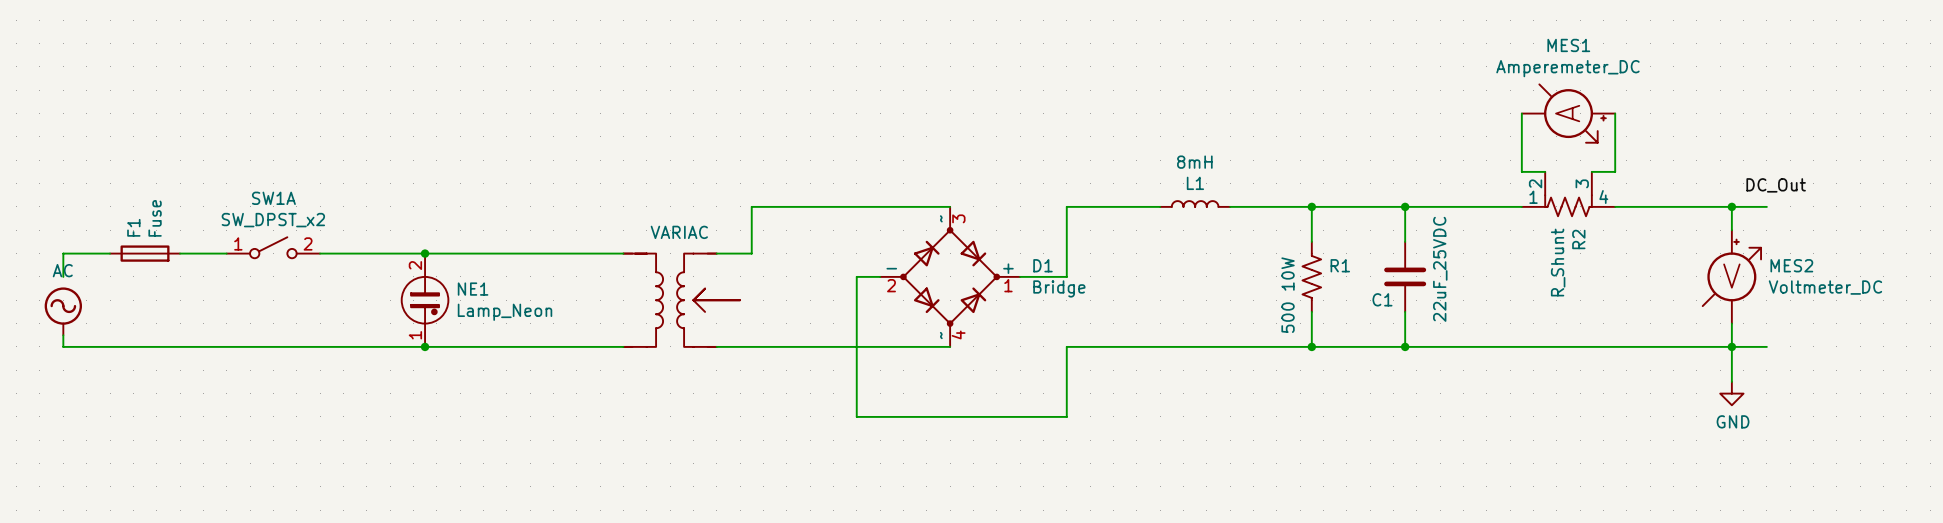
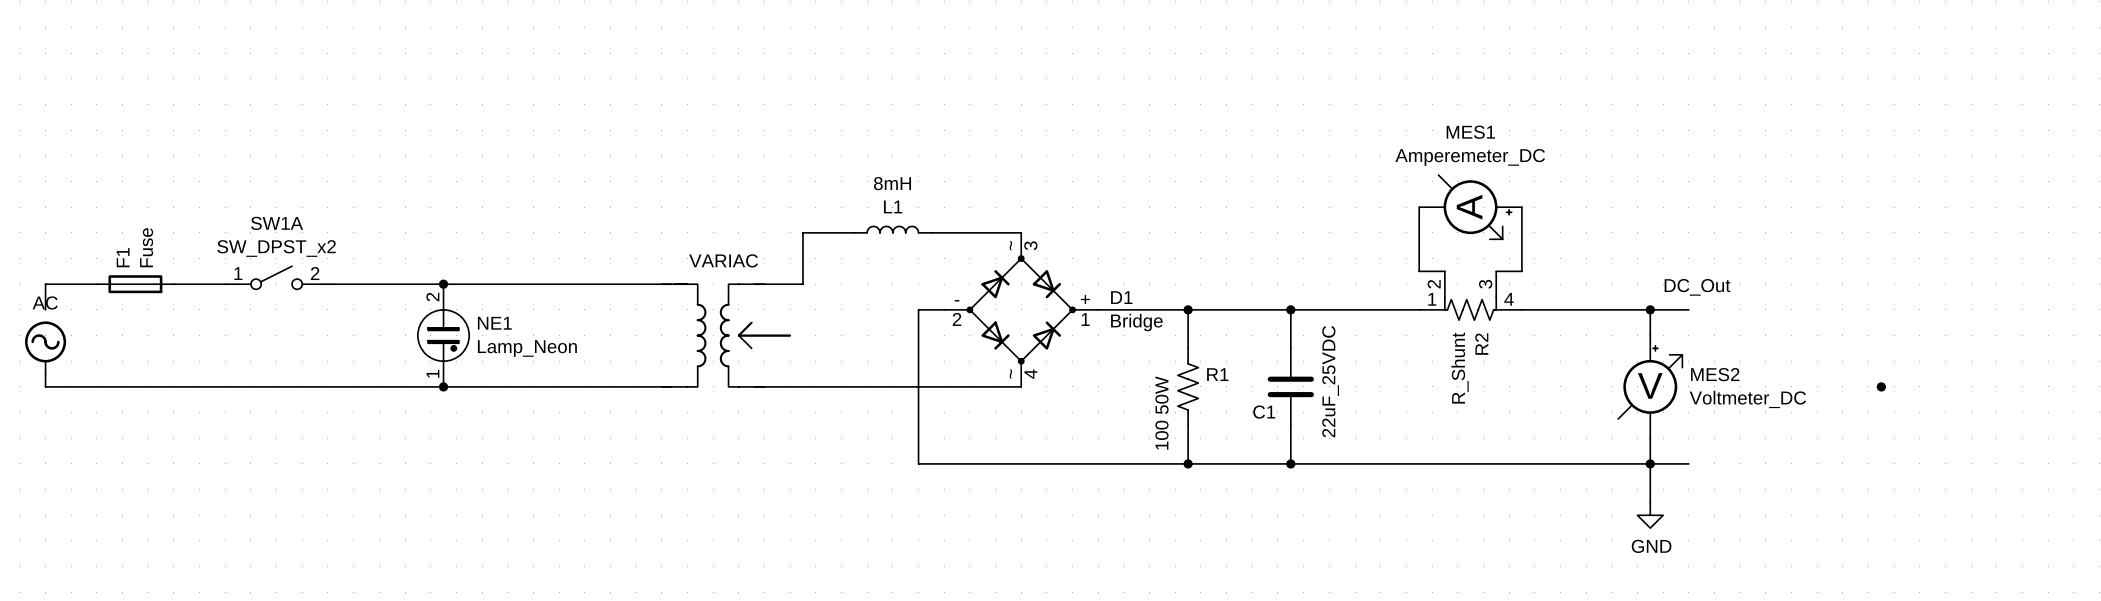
wire: (1521, 113) (1521, 171) (1545, 171) -> none
MES1 position: (1568, 113) -> (1470, 207)
wire: (1615, 113) (1615, 171) (1591, 171) -> none
wire: none -> (1419, 207) (1419, 232)
wire: none -> (1521, 207) (1521, 232)
label position: DC_Out (1776, 185) -> DC_Out (1697, 287)
R2 position: (1568, 194) -> (1470, 295)
8mH position: (1195, 203) -> (892, 229)
wire: (798, 206) (868, 206) -> none
wire: (1160, 206) (1066, 206) (1066, 276) -> (1419, 309) (1149, 309)
wire: (1230, 206) (1521, 206) -> none
junction: (1311, 206) -> none
junction: (1405, 206) -> none
wire: (1615, 206) (1766, 206) -> (1521, 309) (1688, 309)
wire: (1731, 206) (1731, 230) -> (1650, 309) (1650, 335)
junction: (1731, 206) -> none
wire: none -> (1419, 271) (1444, 271)
wire: none -> (1496, 271) (1521, 271)
wire: none -> (1188, 309) (1188, 348)
junction: none -> (1188, 309)
wire: none -> (1290, 309) (1290, 348)
junction: none -> (1290, 309)
R1 position: (1311, 276) -> (1188, 386)
22uF_25VDC position: (1405, 276) -> (1290, 386)
junction: none -> (1650, 309)
MES2 position: (1731, 276) -> (1650, 386)
R1 value: 500 10W (1288, 295) -> 100 50W (1161, 413)
wire: (1311, 311) (1311, 346) -> (1188, 425) (1188, 463)
wire: (1405, 311) (1405, 346) -> (1290, 425) (1290, 463)
wire: (1731, 323) (1731, 381) -> (1650, 438) (1650, 502)
junction: (1311, 346) -> none
junction: (1405, 346) -> none
wire: (1766, 346) (1066, 346) (1066, 416) -> (1688, 463) (1149, 463)
power symbol position: GND (1731, 393) -> GND (1650, 515)
junction: none -> (1188, 463)
junction: none -> (1290, 463)
junction: none -> (1650, 463)

